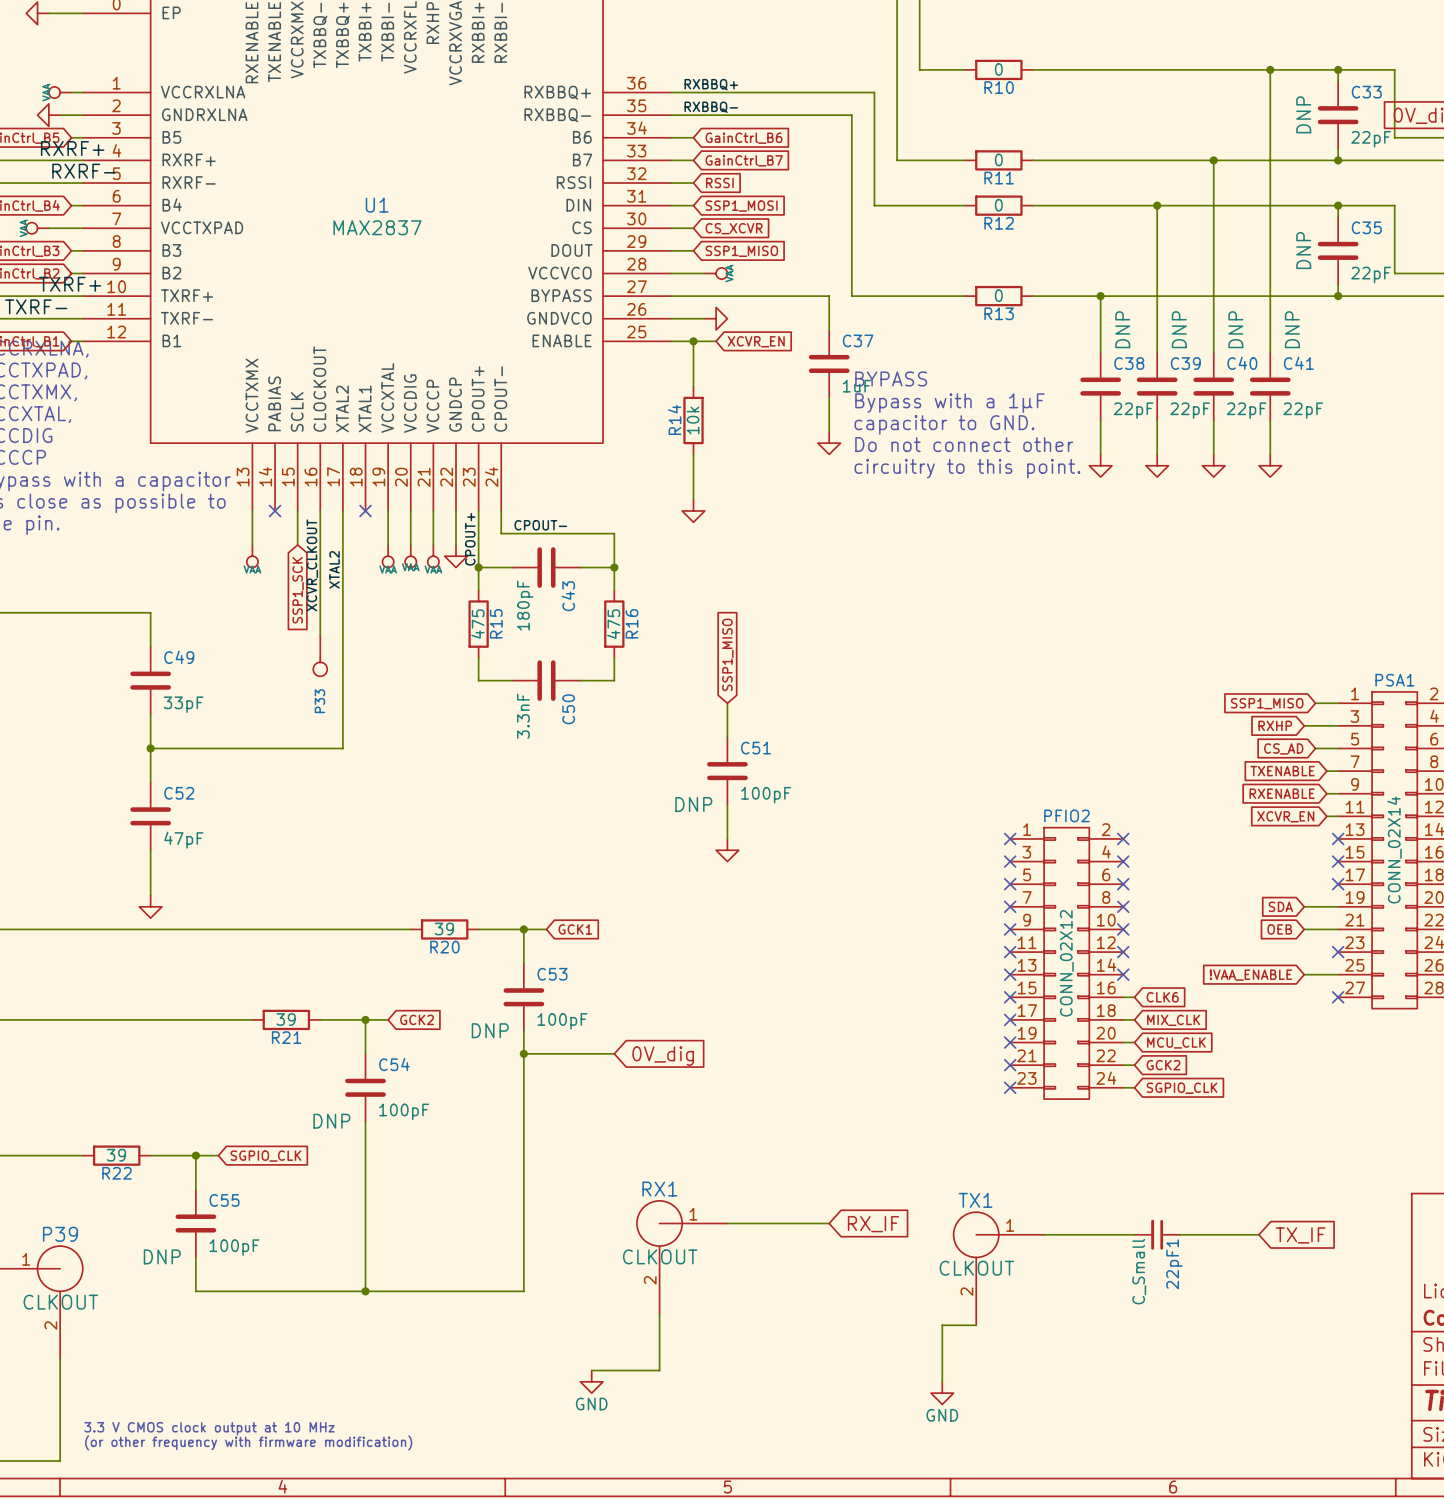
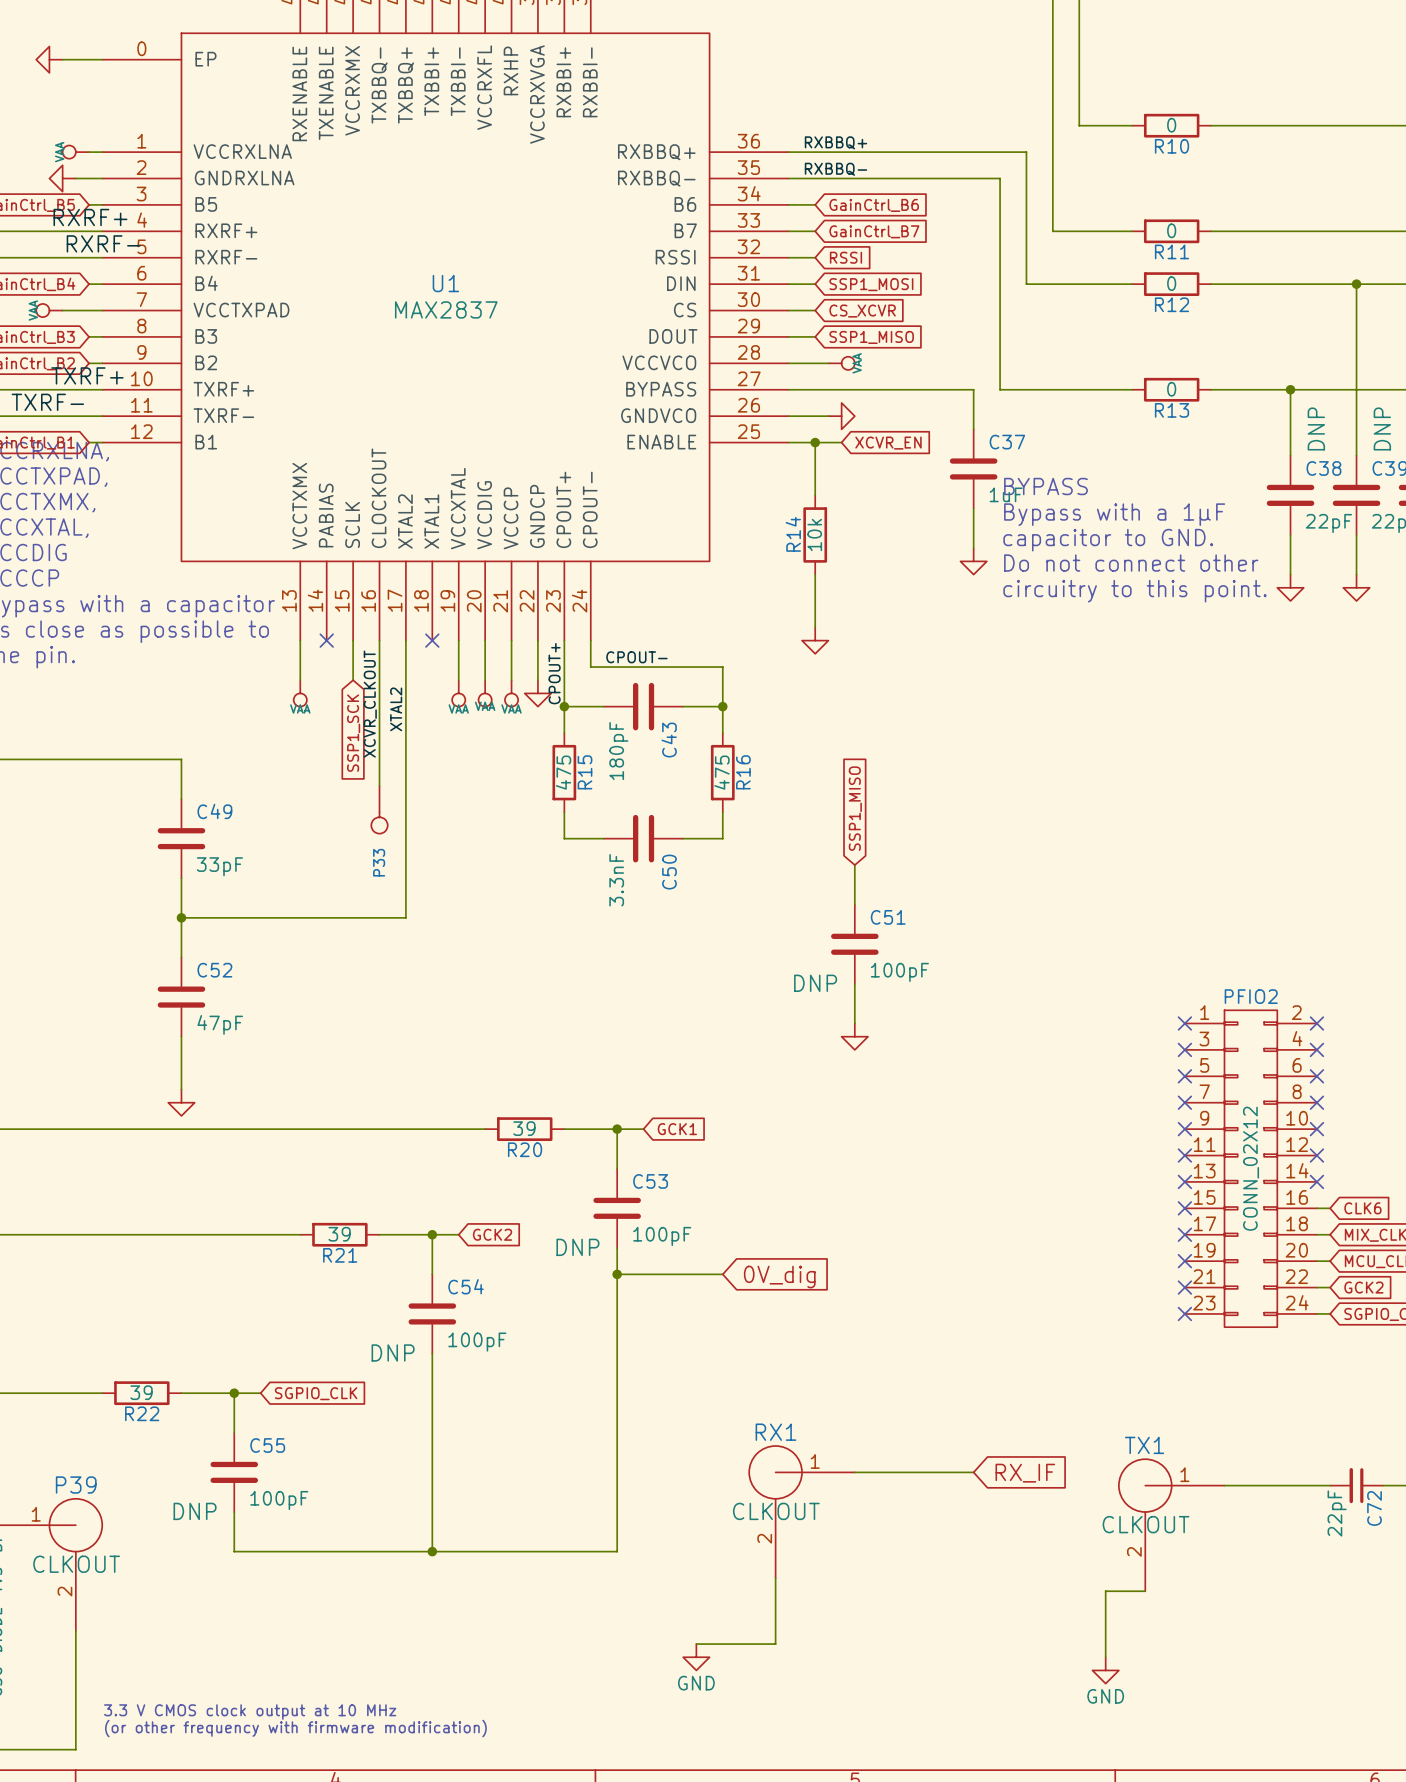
22pF1 name: 22pF1 (1174, 1264) -> C72 (1374, 1508)
22pF1 value: C_Small (1139, 1271) -> 22pF (1337, 1513)

